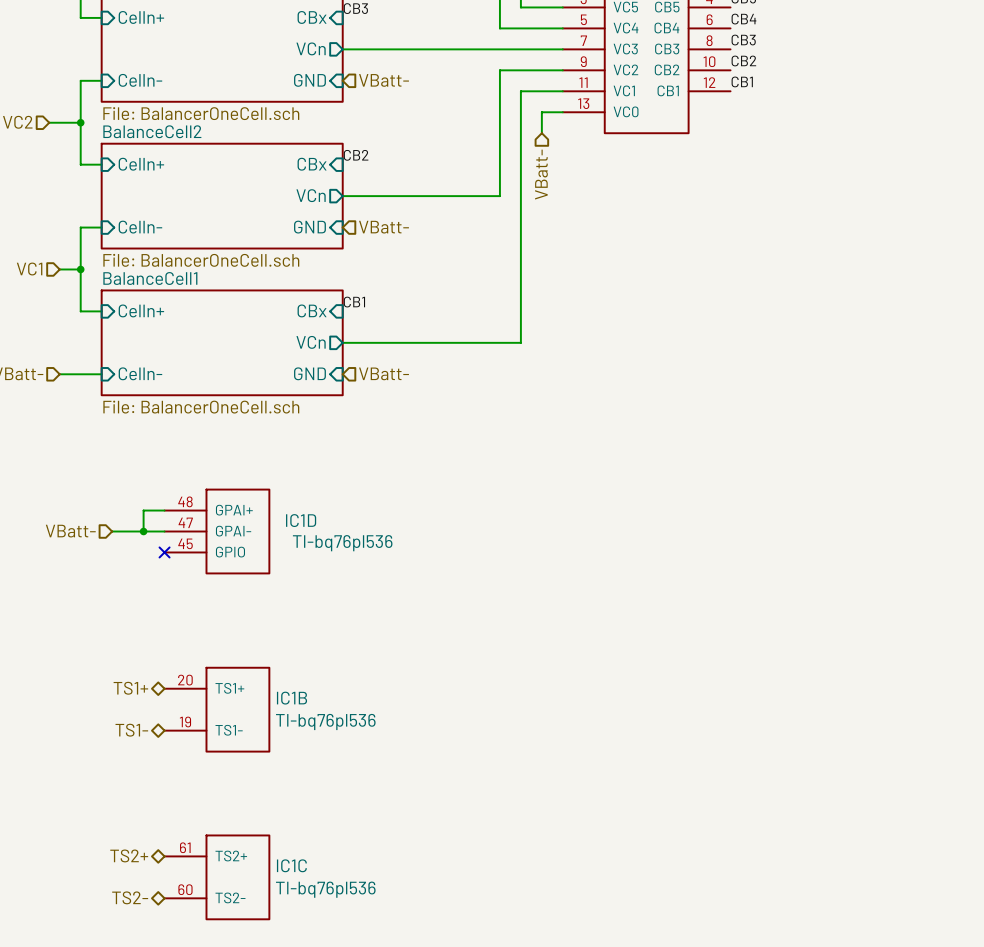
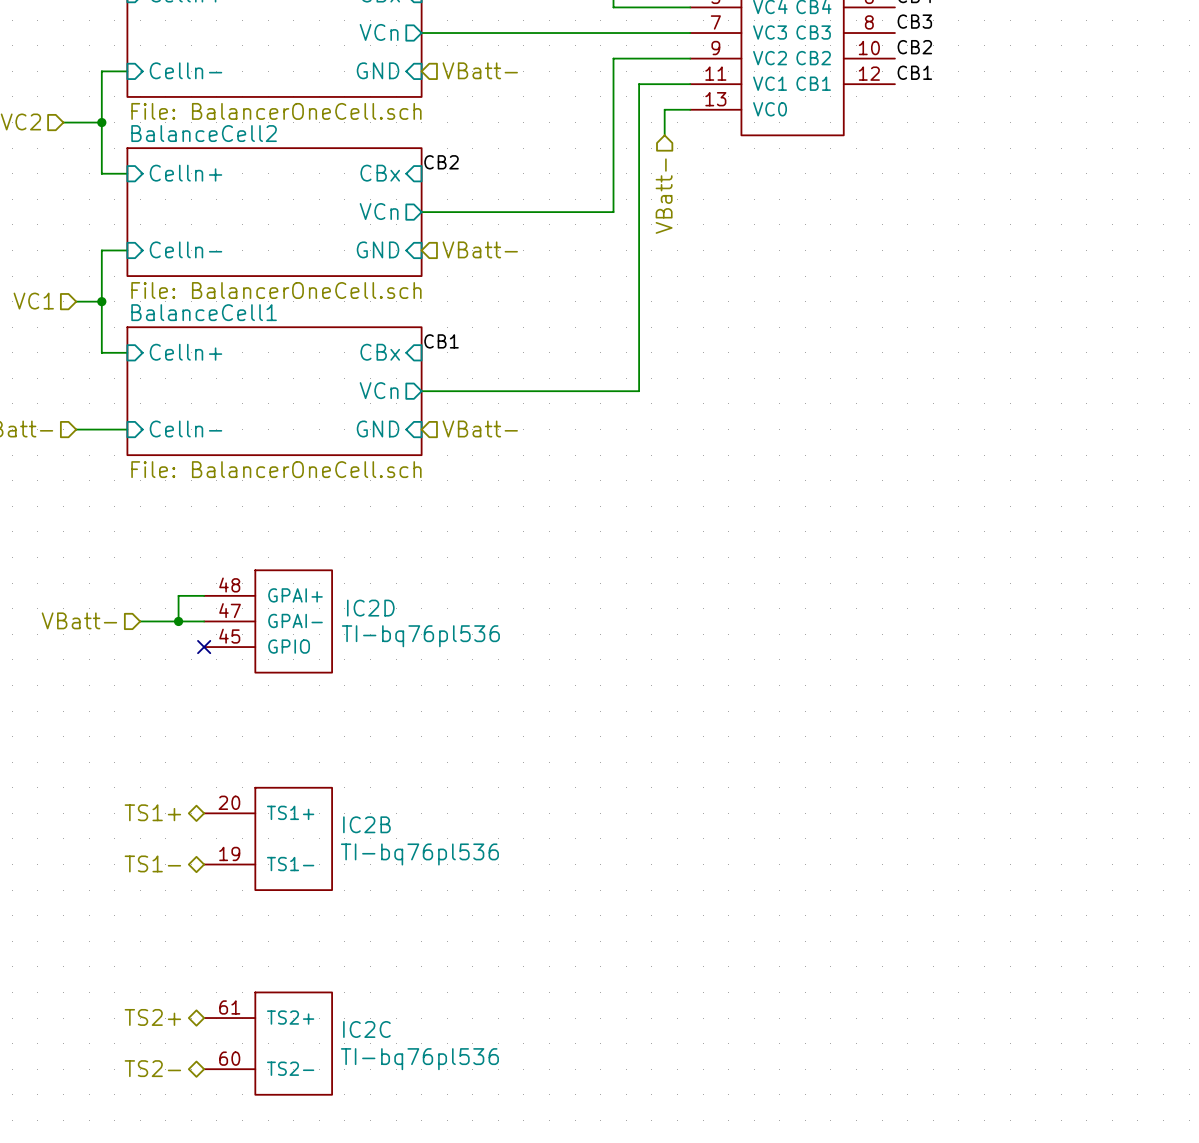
IC1D name: IC1D (301, 520) -> IC2D (370, 608)
IC1B name: IC1B (291, 698) -> IC2B (366, 824)
IC1C name: IC1C (291, 865) -> IC2C (366, 1029)

